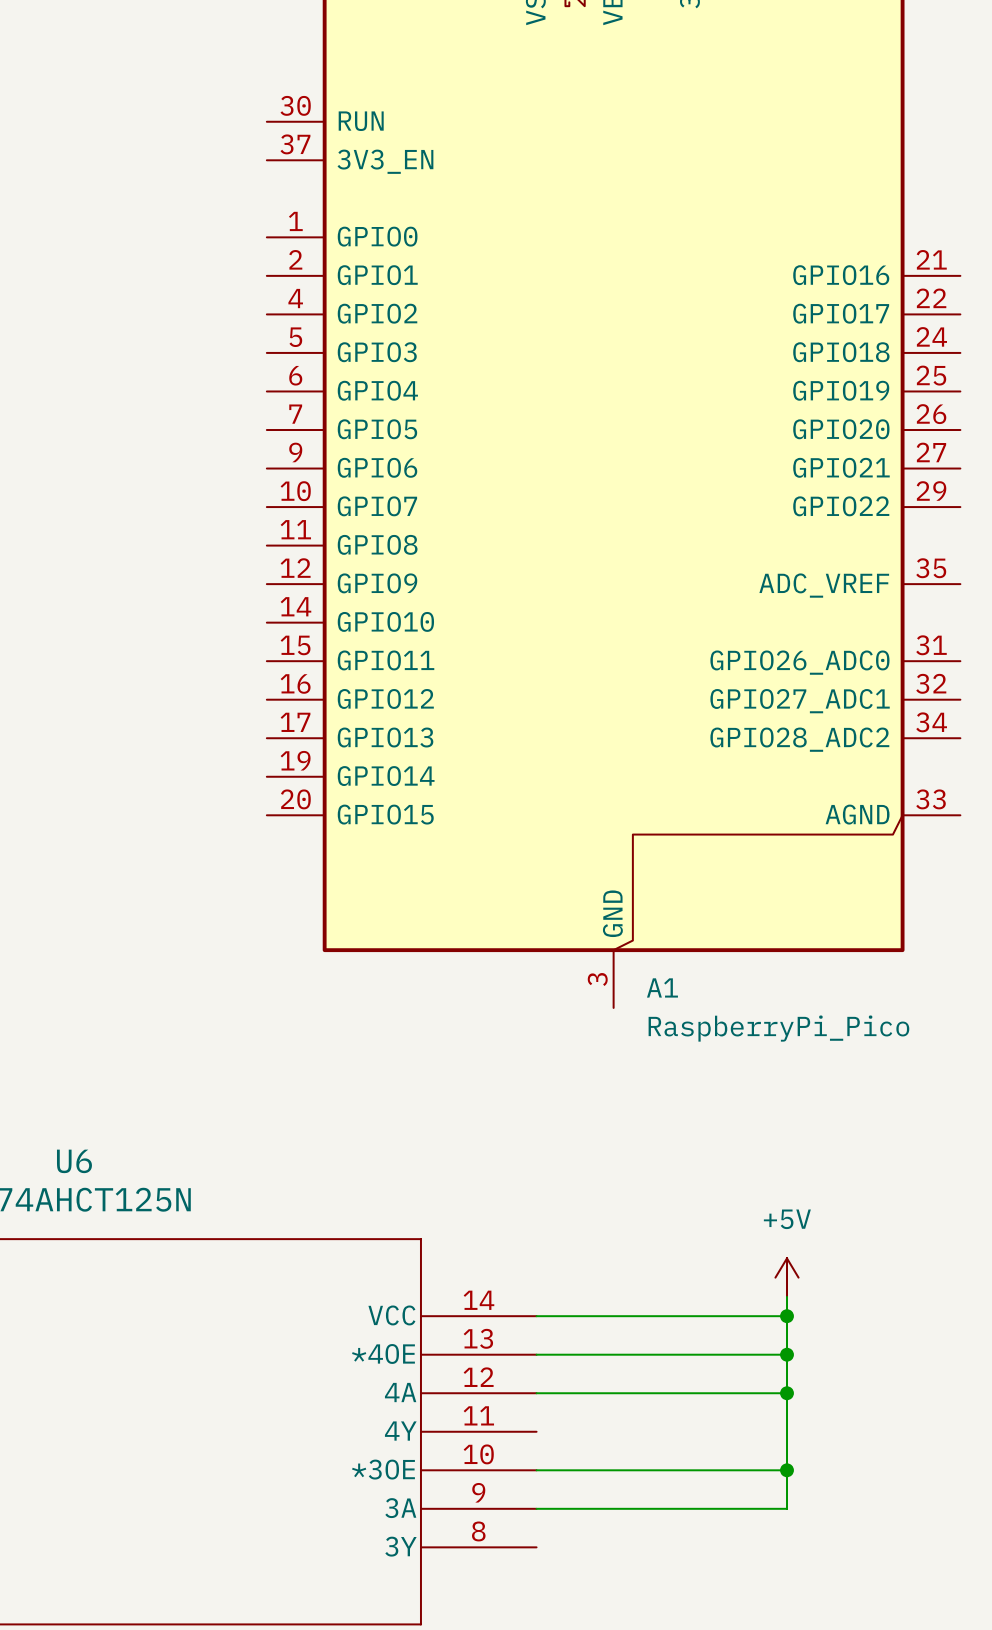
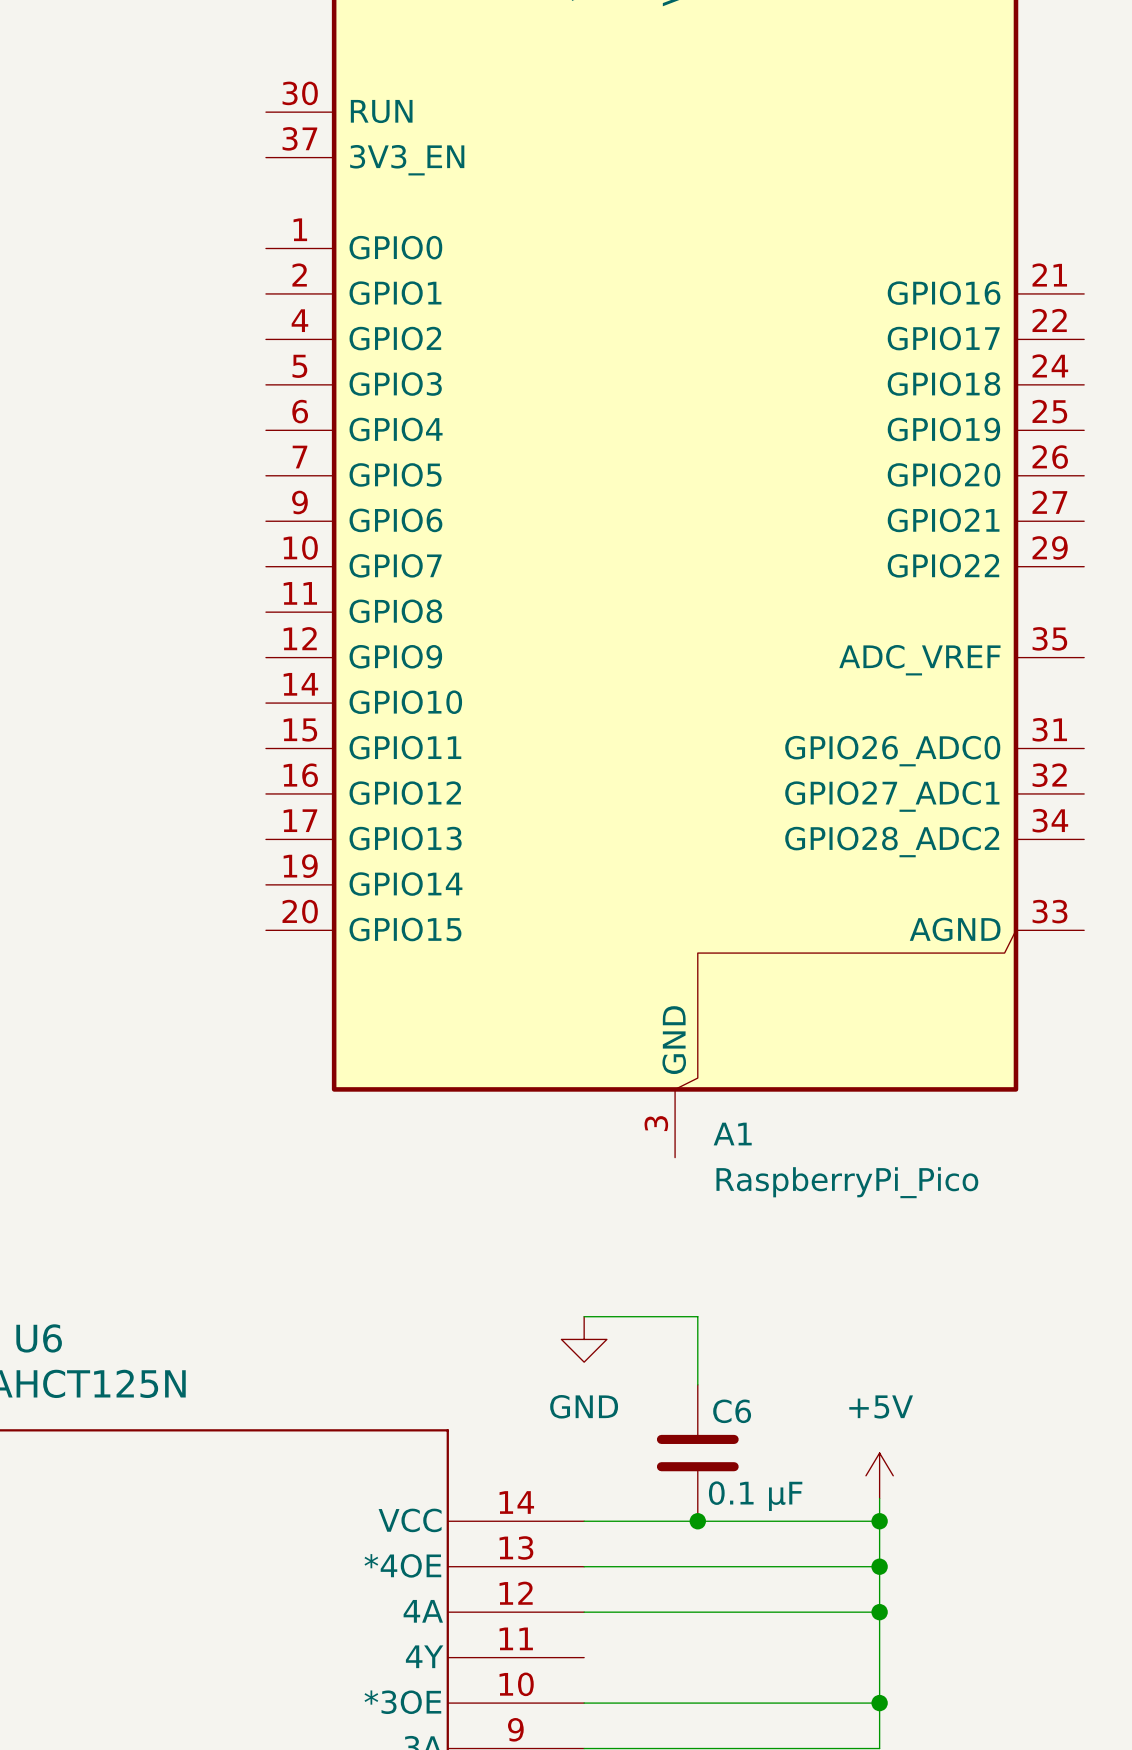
wire: none -> (584, 1316) (697, 1316) (697, 1384)
power symbol: none -> GND (584, 1339)
C6: none -> 0.1 μF (697, 1453)
junction: none -> (697, 1521)

